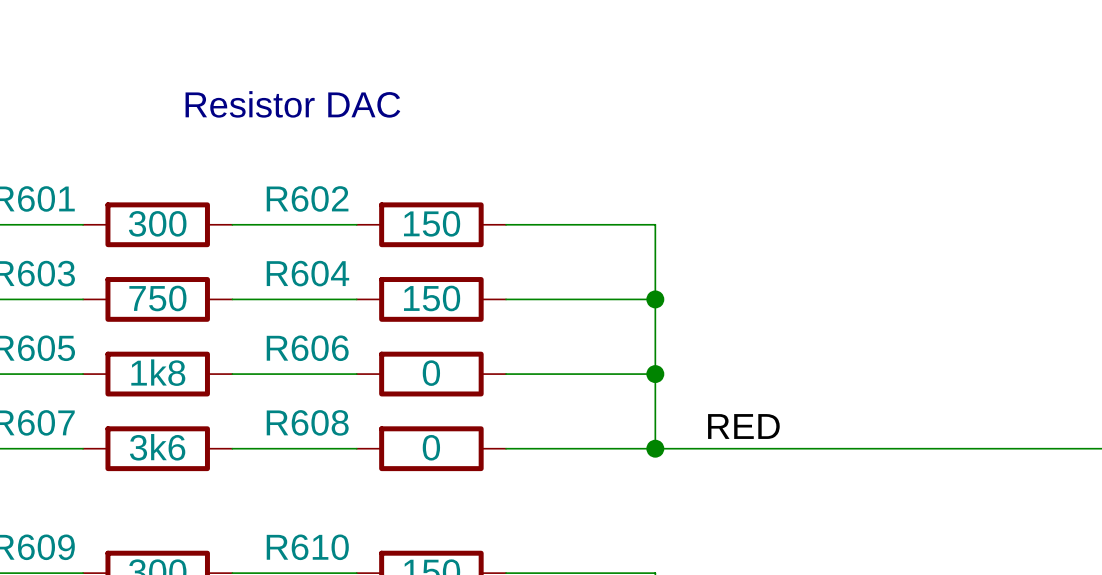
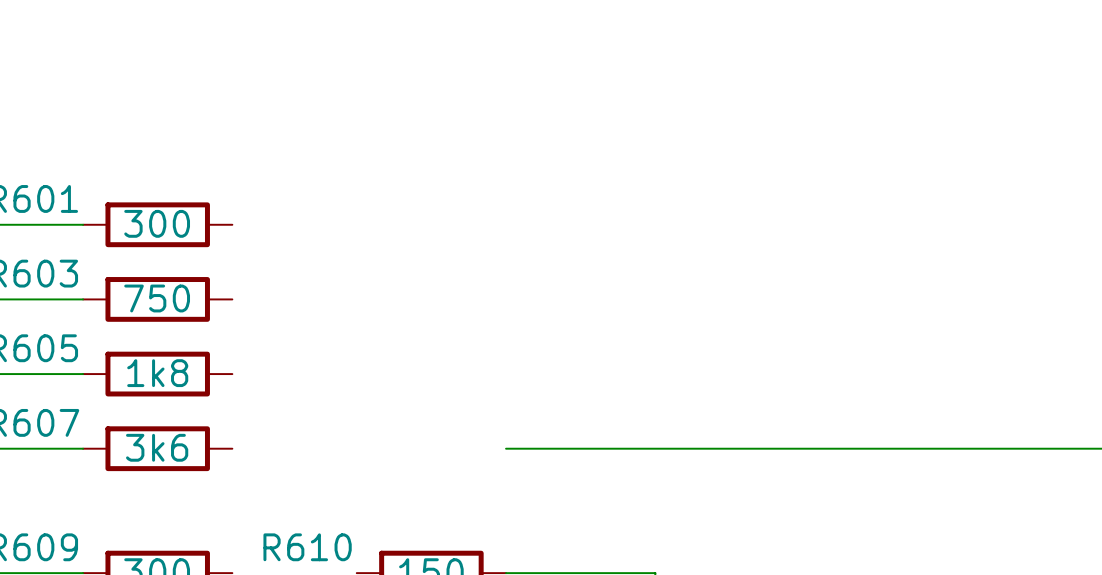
text: Resistor DAC (292, 104) -> none
wire: (232, 224) (356, 224) -> none
R602: 150 (431, 224) -> none
wire: (506, 224) (655, 224) (655, 448) -> none
wire: (232, 299) (356, 299) -> none
R604: 150 (431, 299) -> none
wire: (506, 299) (655, 299) -> none
junction: (655, 299) -> none
wire: (232, 374) (356, 374) -> none
R606: 0 (431, 374) -> none
wire: (506, 374) (655, 374) -> none
junction: (655, 374) -> none
label: RED (743, 426) -> none
wire: (232, 448) (356, 448) -> none
R608: 0 (431, 448) -> none
junction: (655, 448) -> none
wire: (232, 573) (356, 573) -> none

